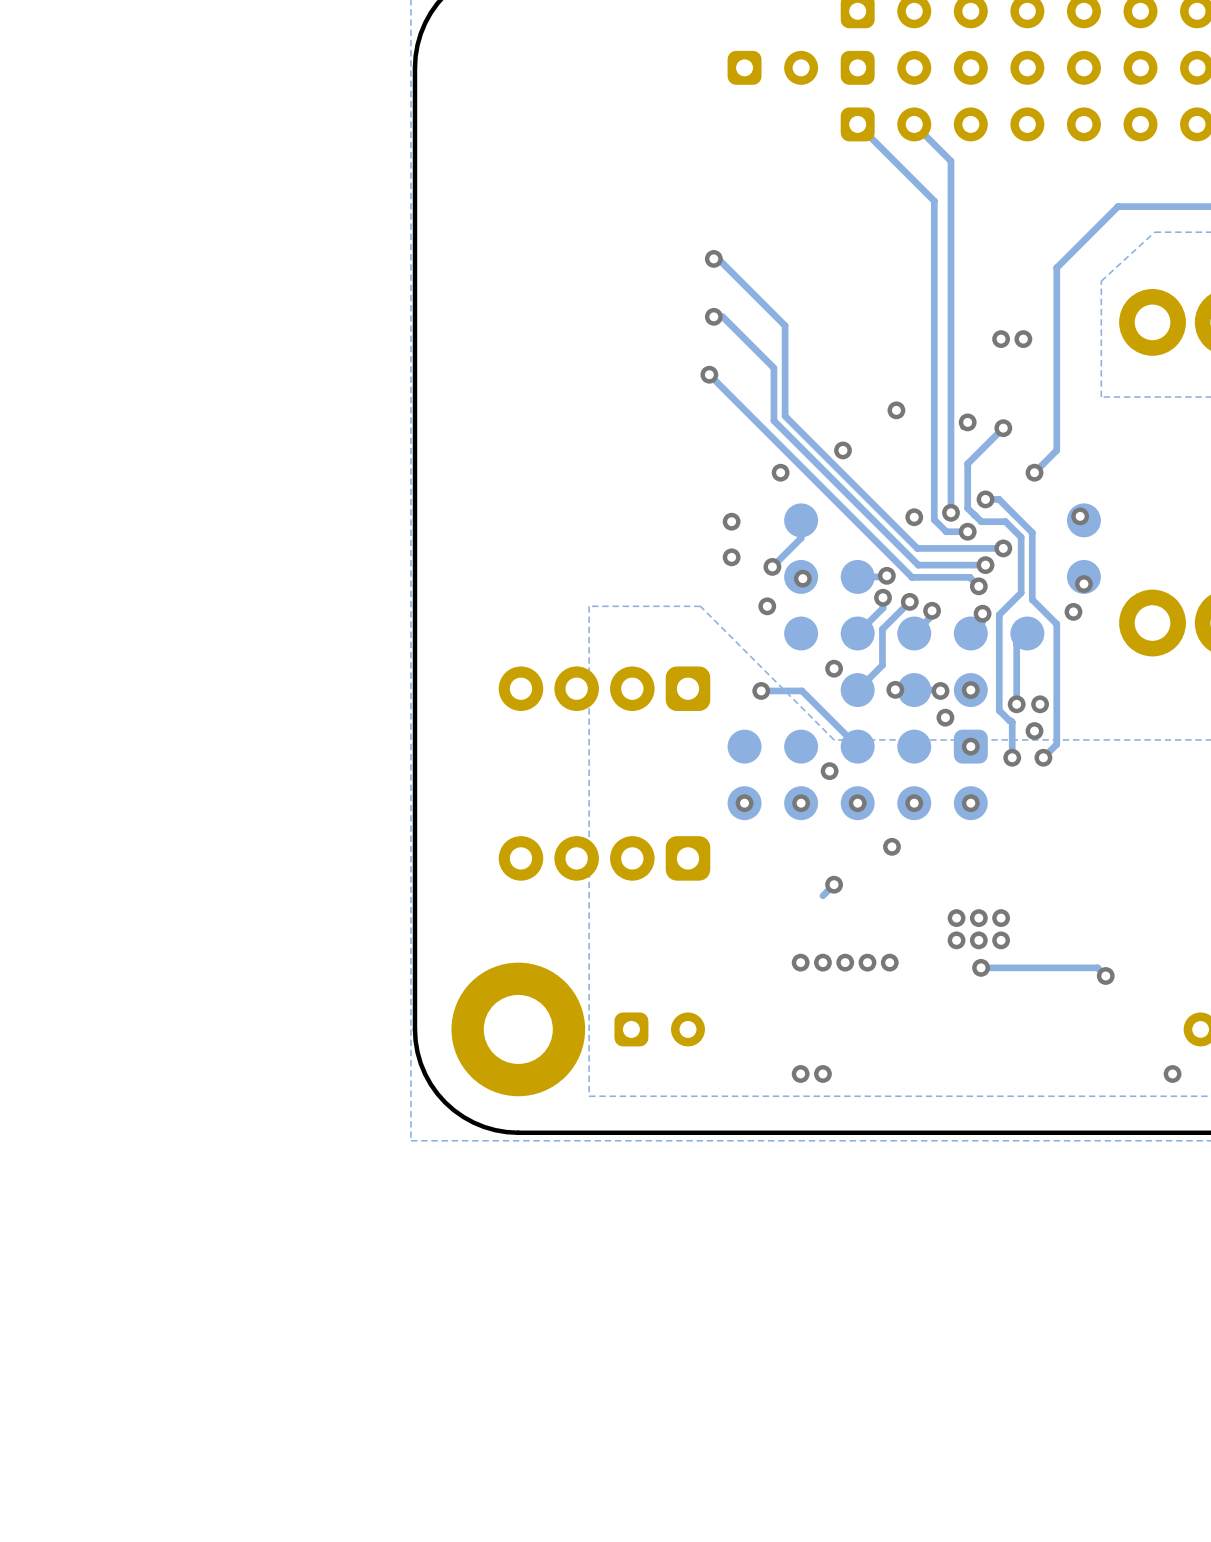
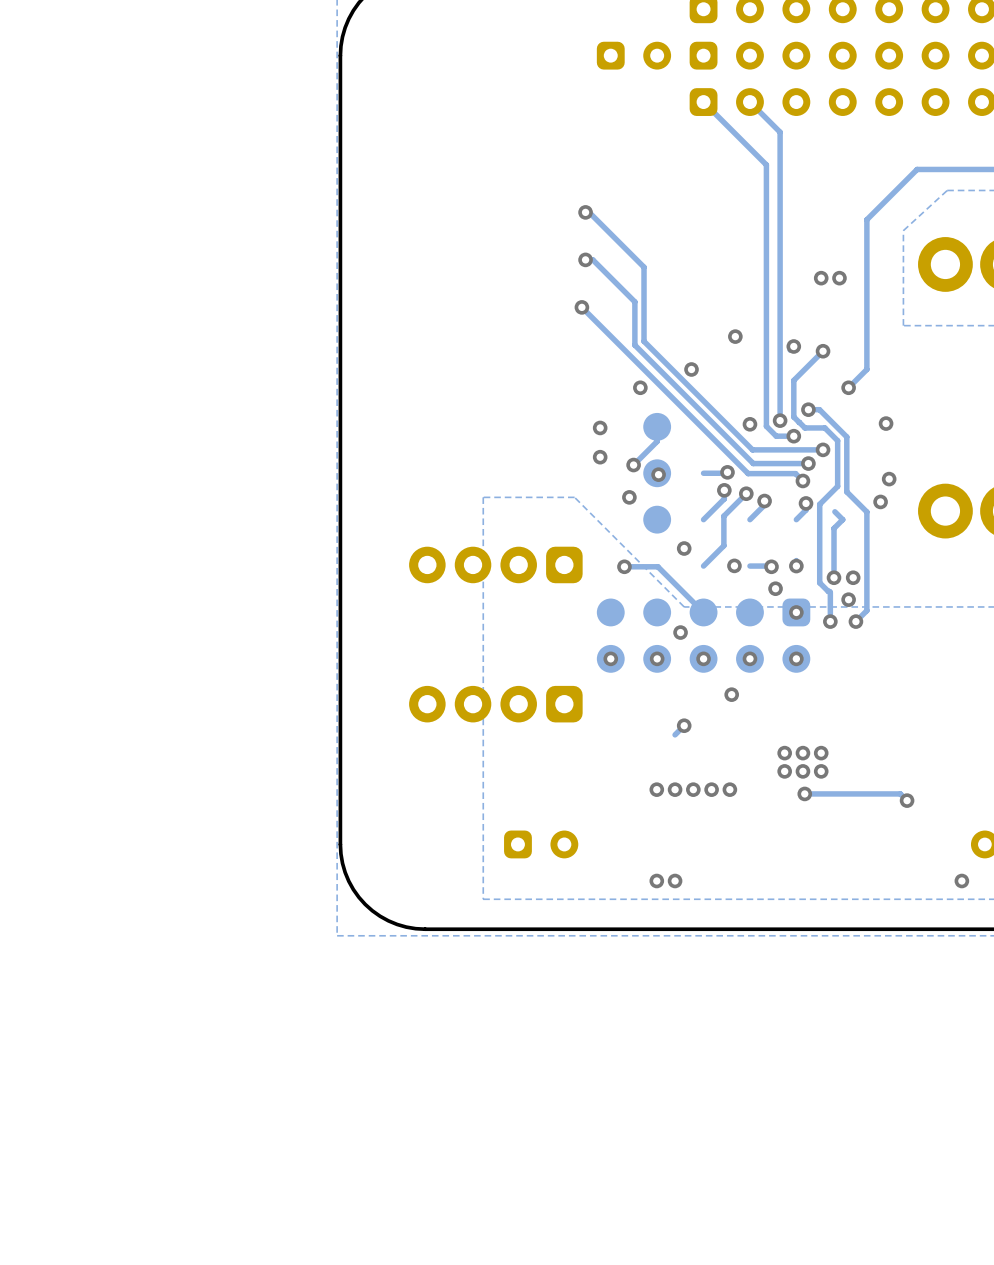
part: (1083, 520) -> none
part: (857, 576) -> none
part: (1083, 576) -> none
part: (857, 633) -> none
part: (914, 633) -> none
part: (970, 633) -> none
part: (1027, 633) -> none
part: (857, 690) -> none
part: (914, 690) -> none
part: (970, 690) -> none
part: (518, 1029) -> none

